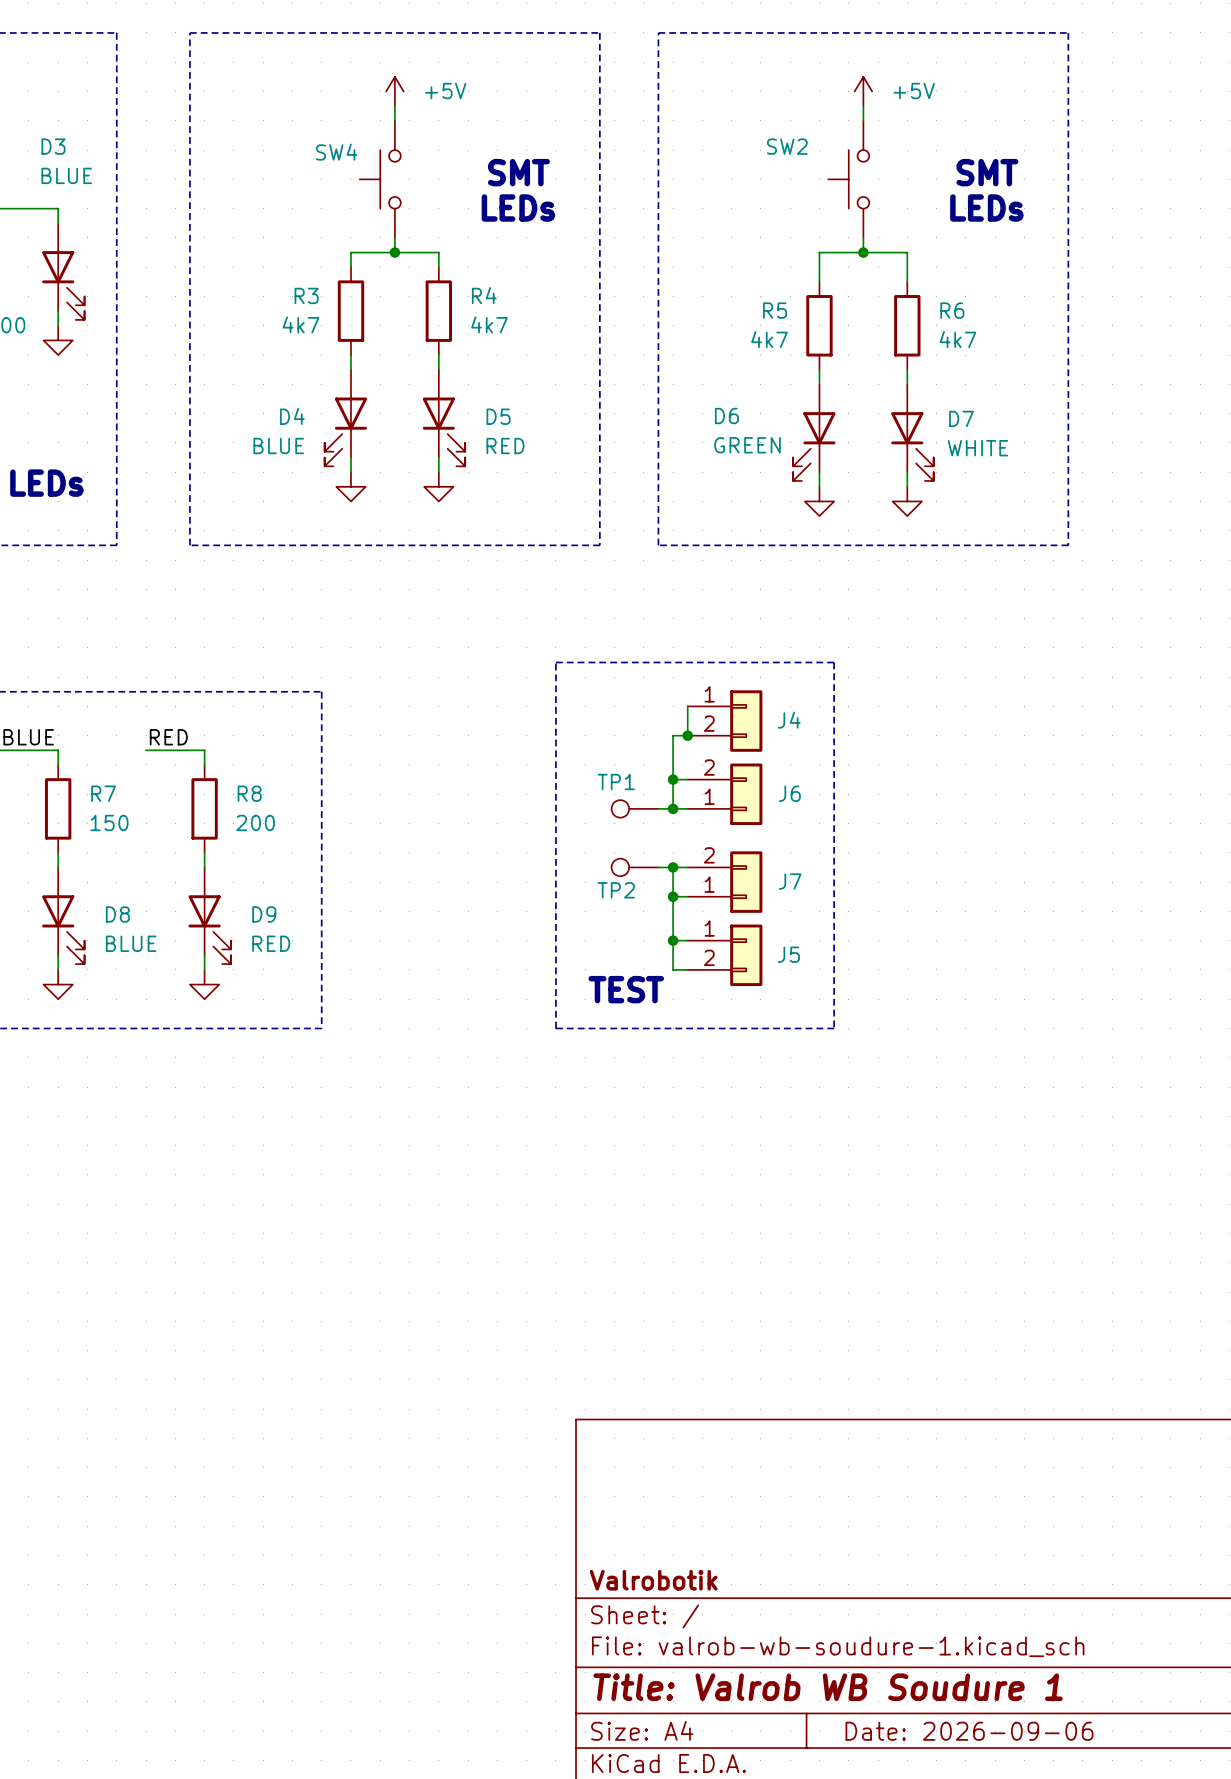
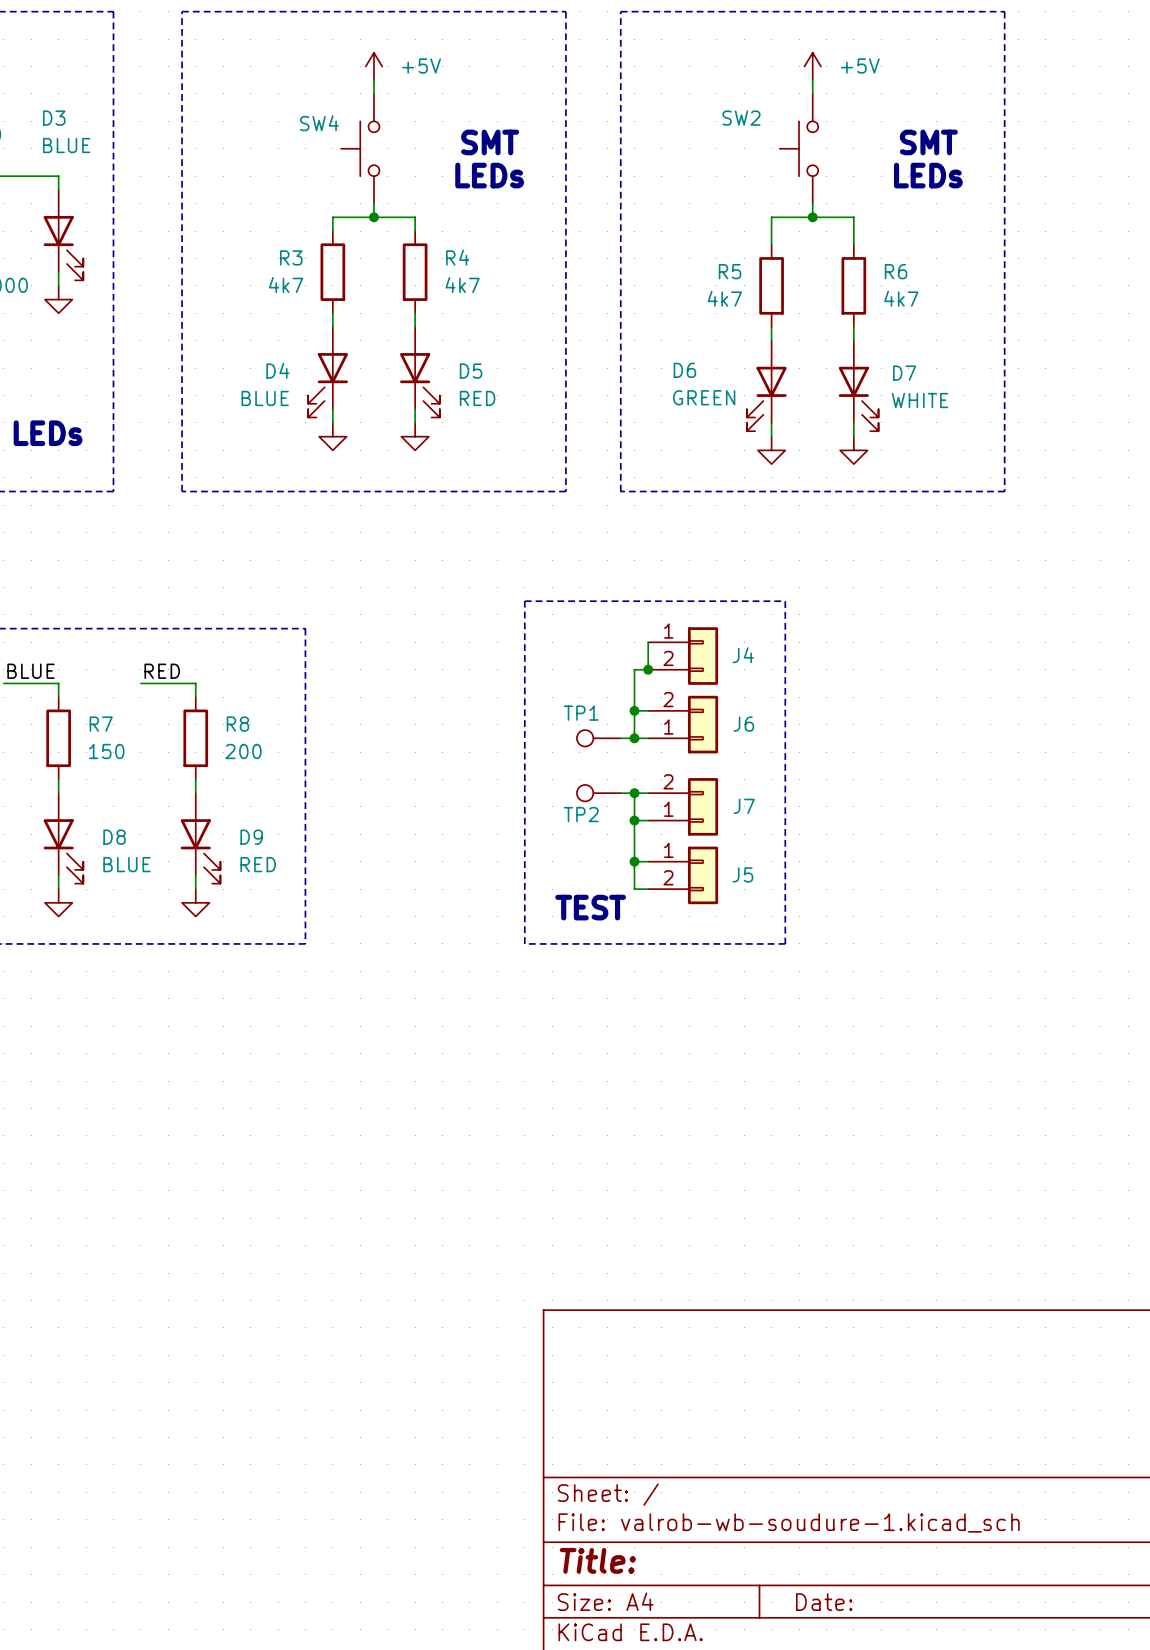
title block: Valrobotik (653, 1580) -> none
title block: Title: Valrob WB Soudure 1 (828, 1687) -> Title: (597, 1560)
title block: Date: 2026-09-06 (969, 1731) -> Date: (824, 1602)

